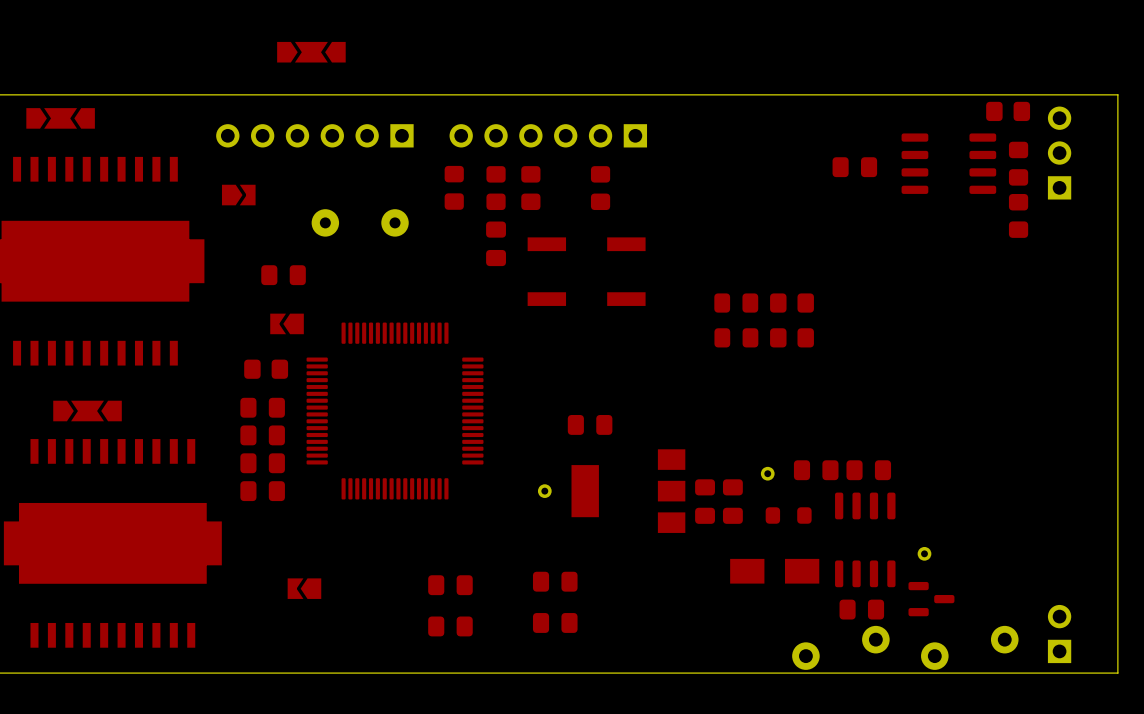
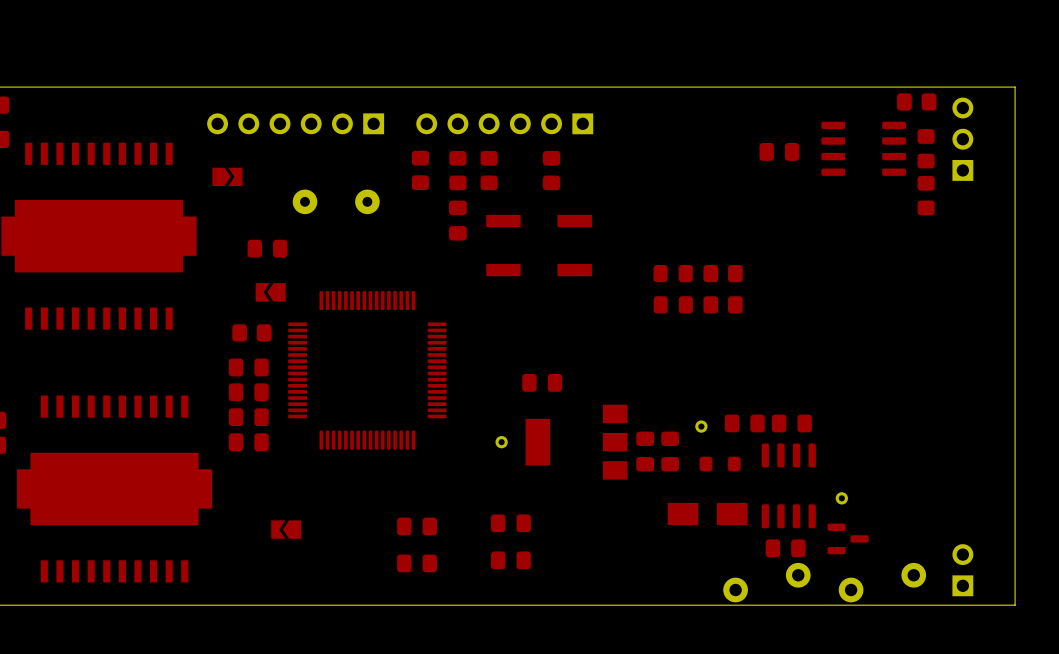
part: (311, 52) -> none
part: (60, 118) -> none
part: (87, 411) -> none

